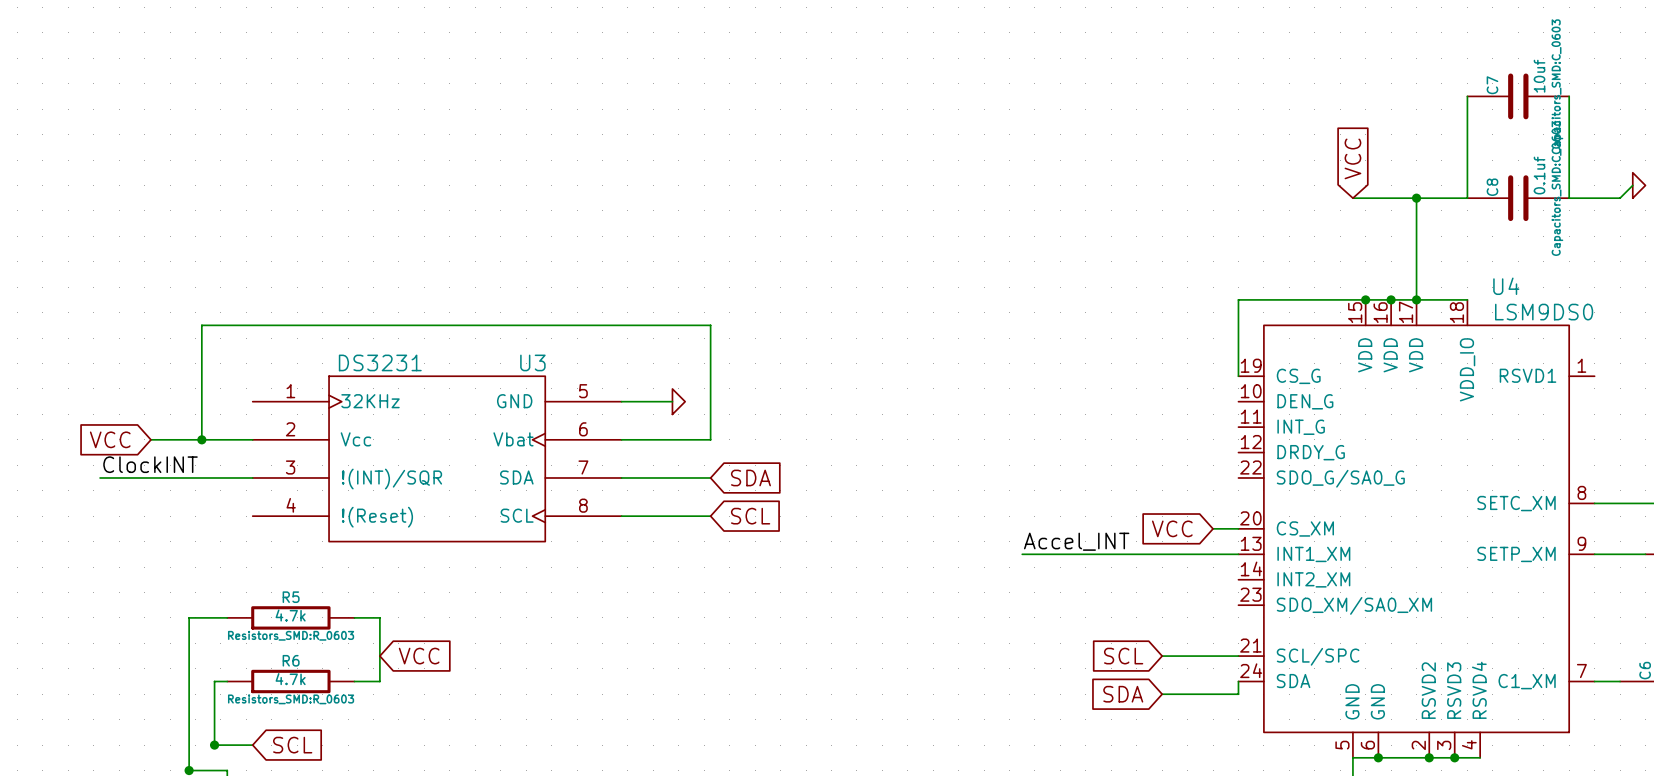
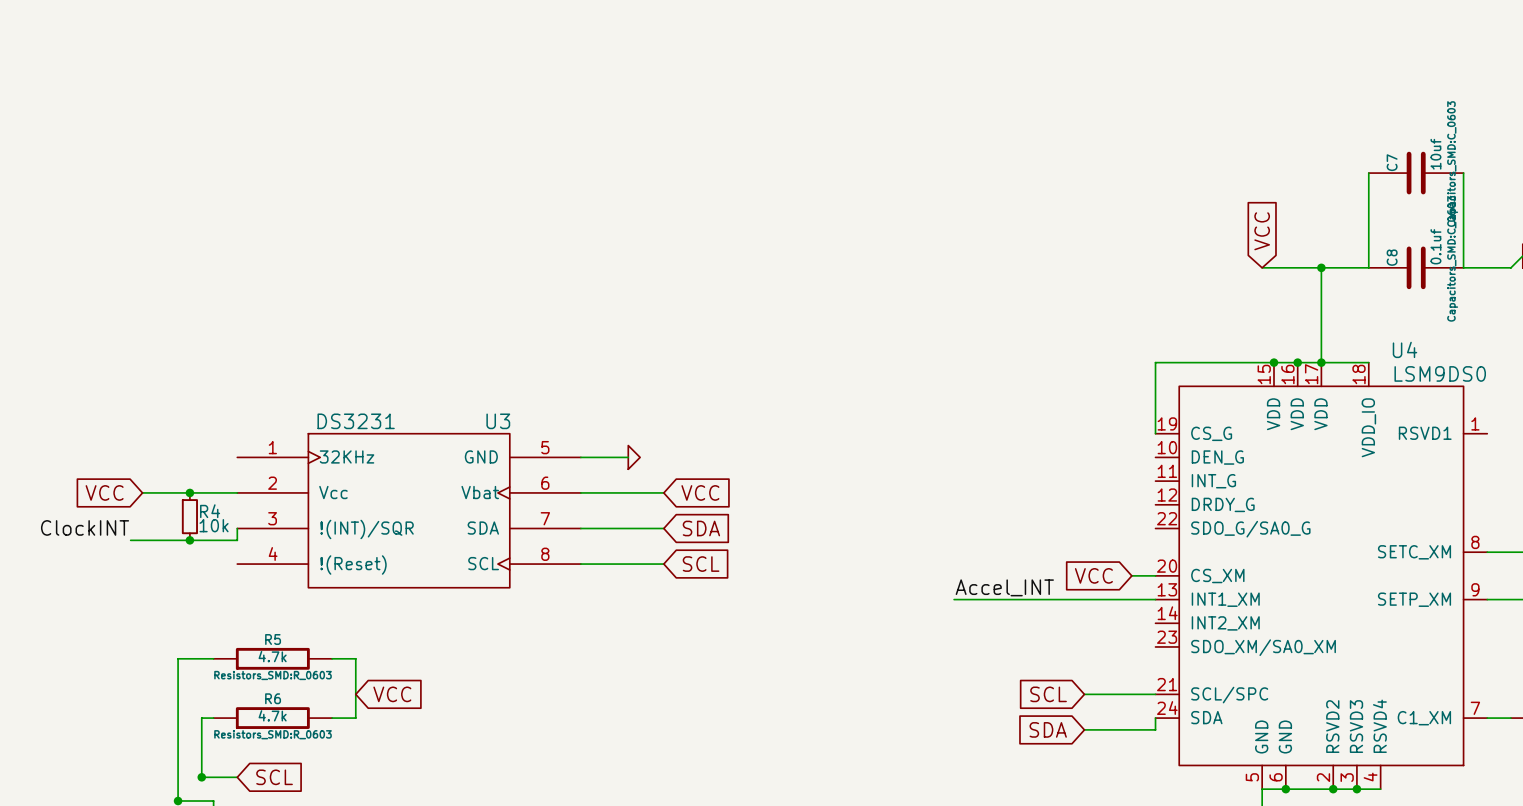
wire: (201, 439) (201, 325) (710, 325) (710, 439) -> none
global label: none -> VCC (700, 492)
label position: ClockINT (150, 464) -> ClockINT (85, 527)
R4: none -> 10k (189, 516)
wire: (100, 477) (252, 477) -> (130, 540) (237, 540) (237, 528)
junction: none -> (189, 540)

